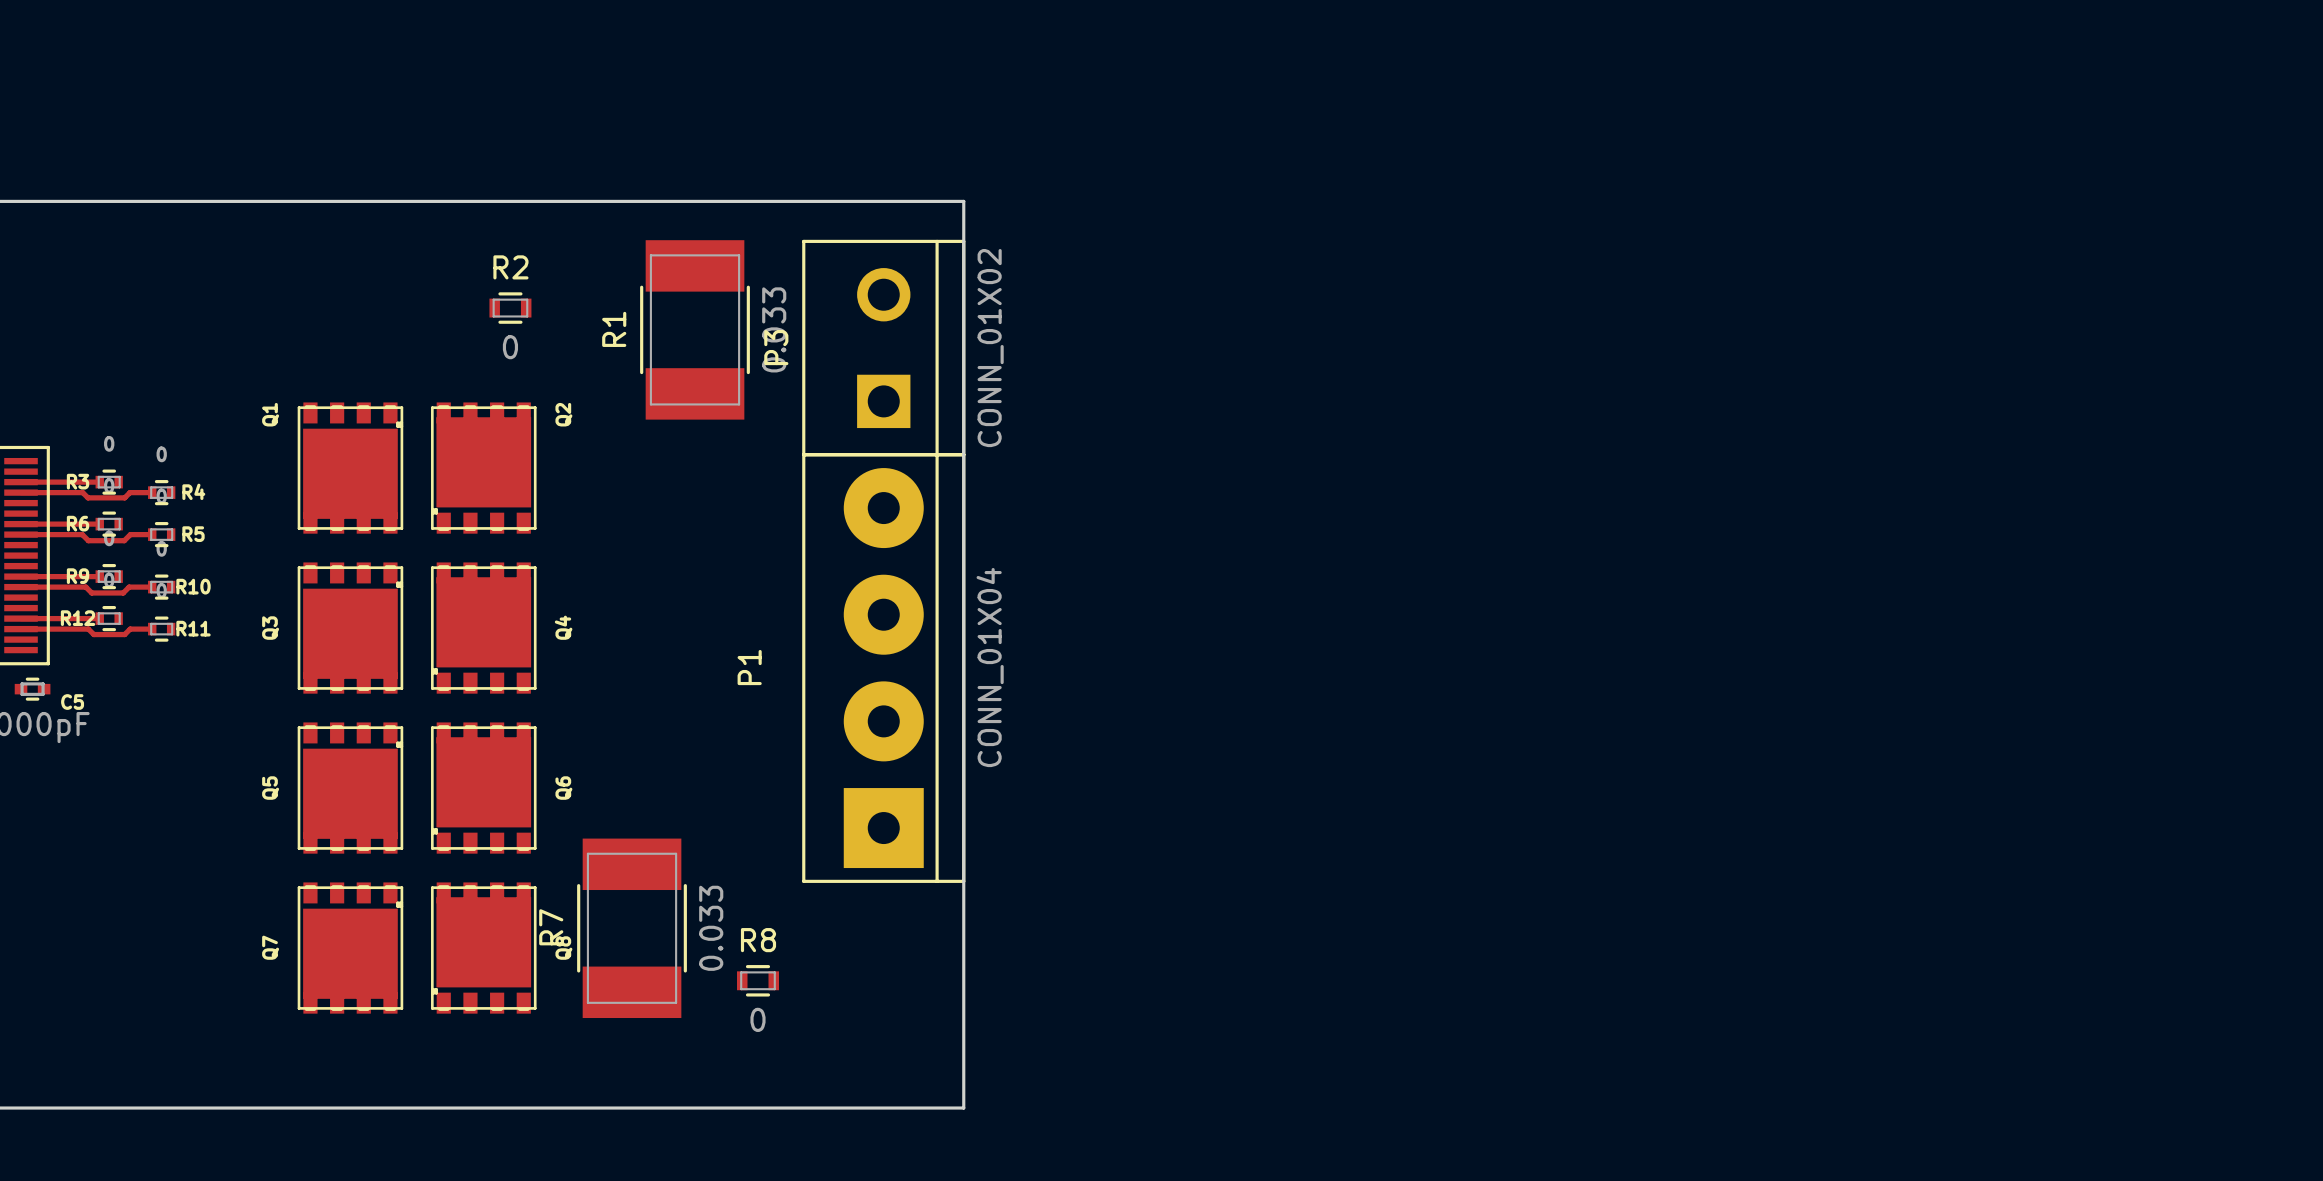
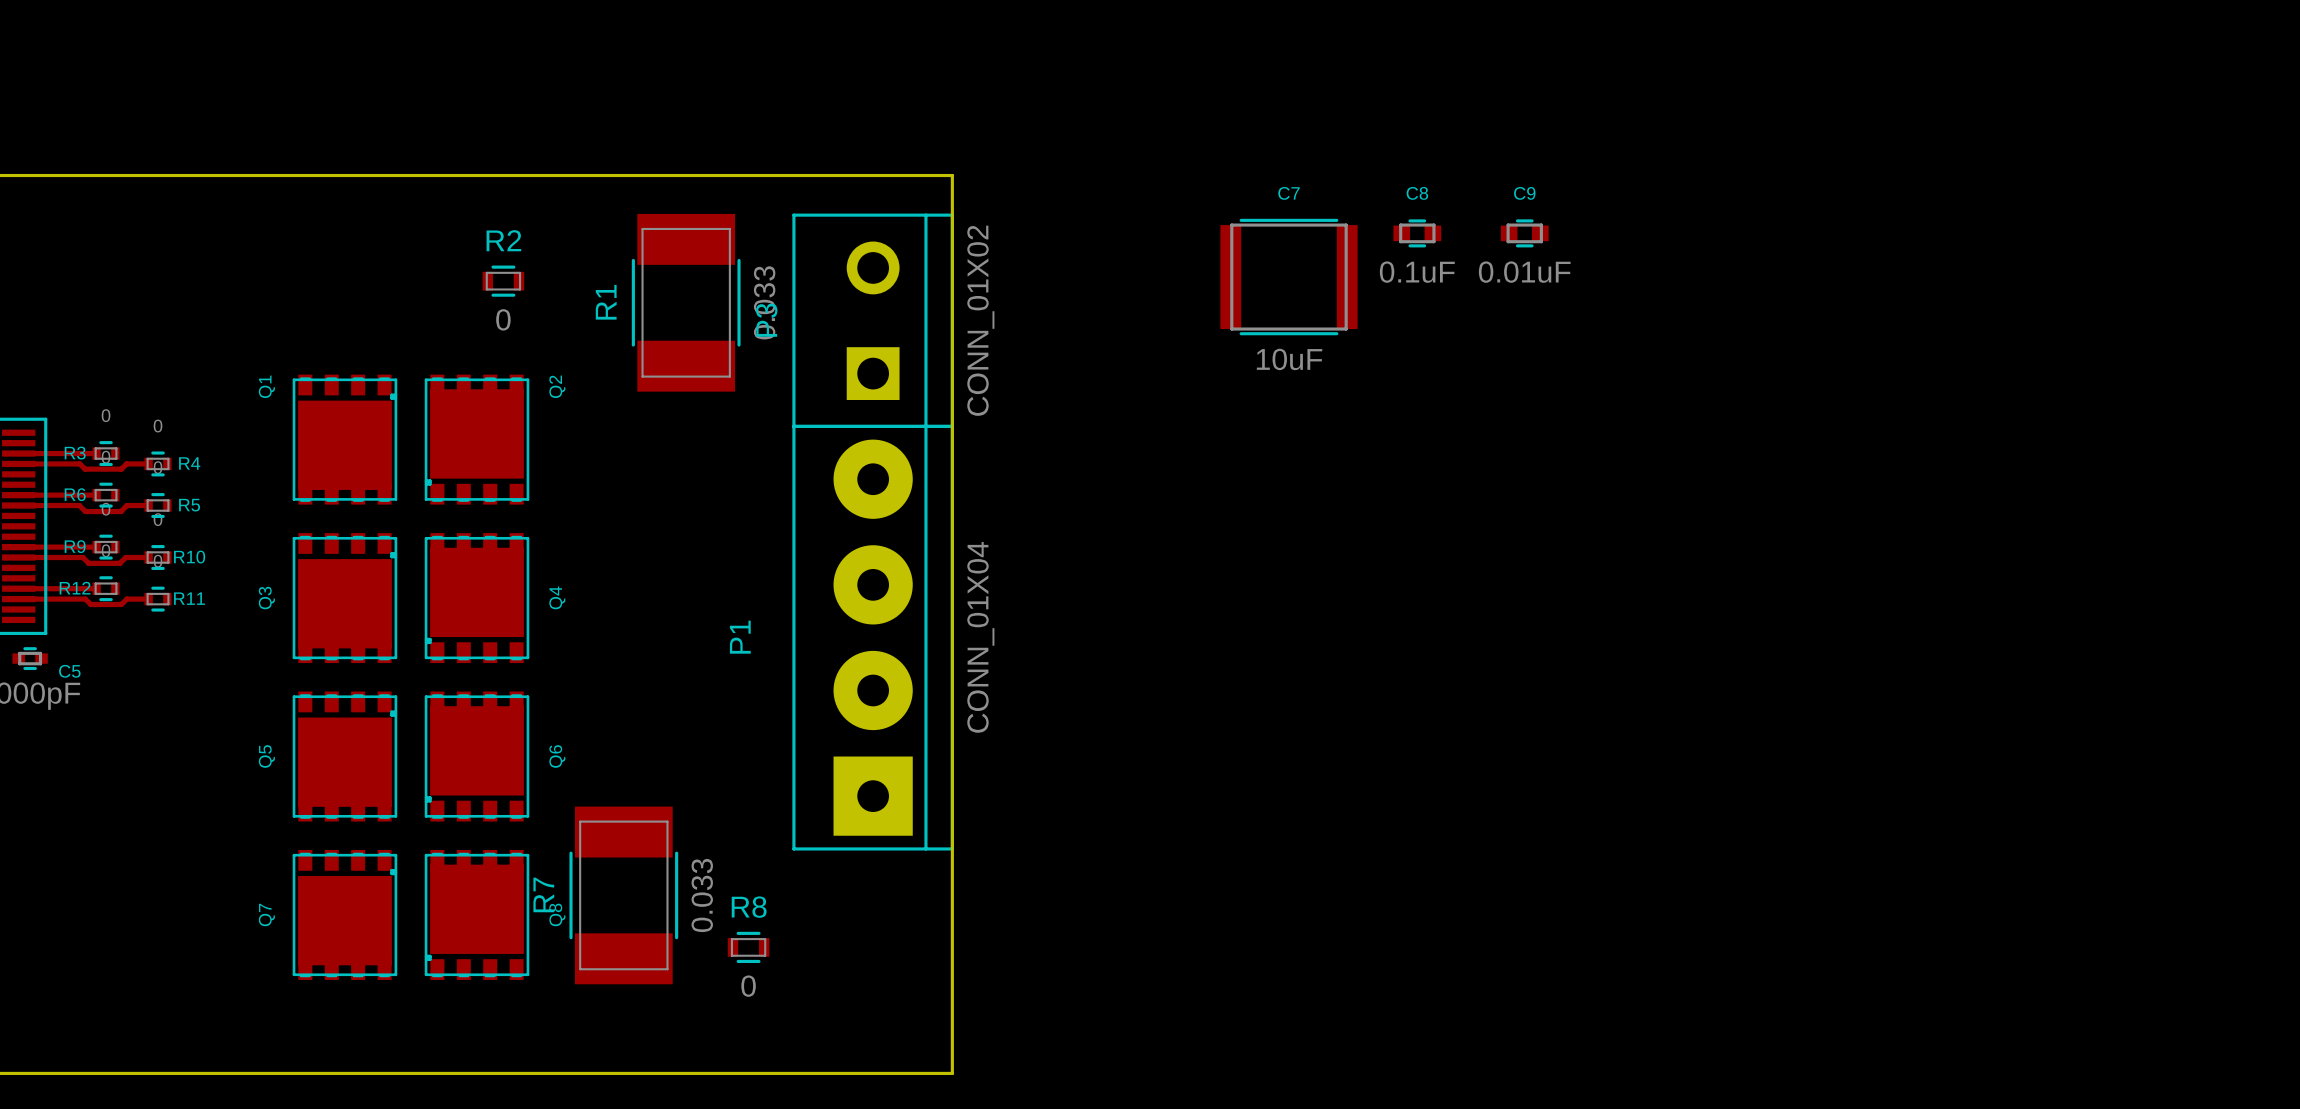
C8: none -> 0.1uF (1417, 233)
C9: none -> 0.01uF (1524, 233)
C7: none -> 10uF (1288, 277)

